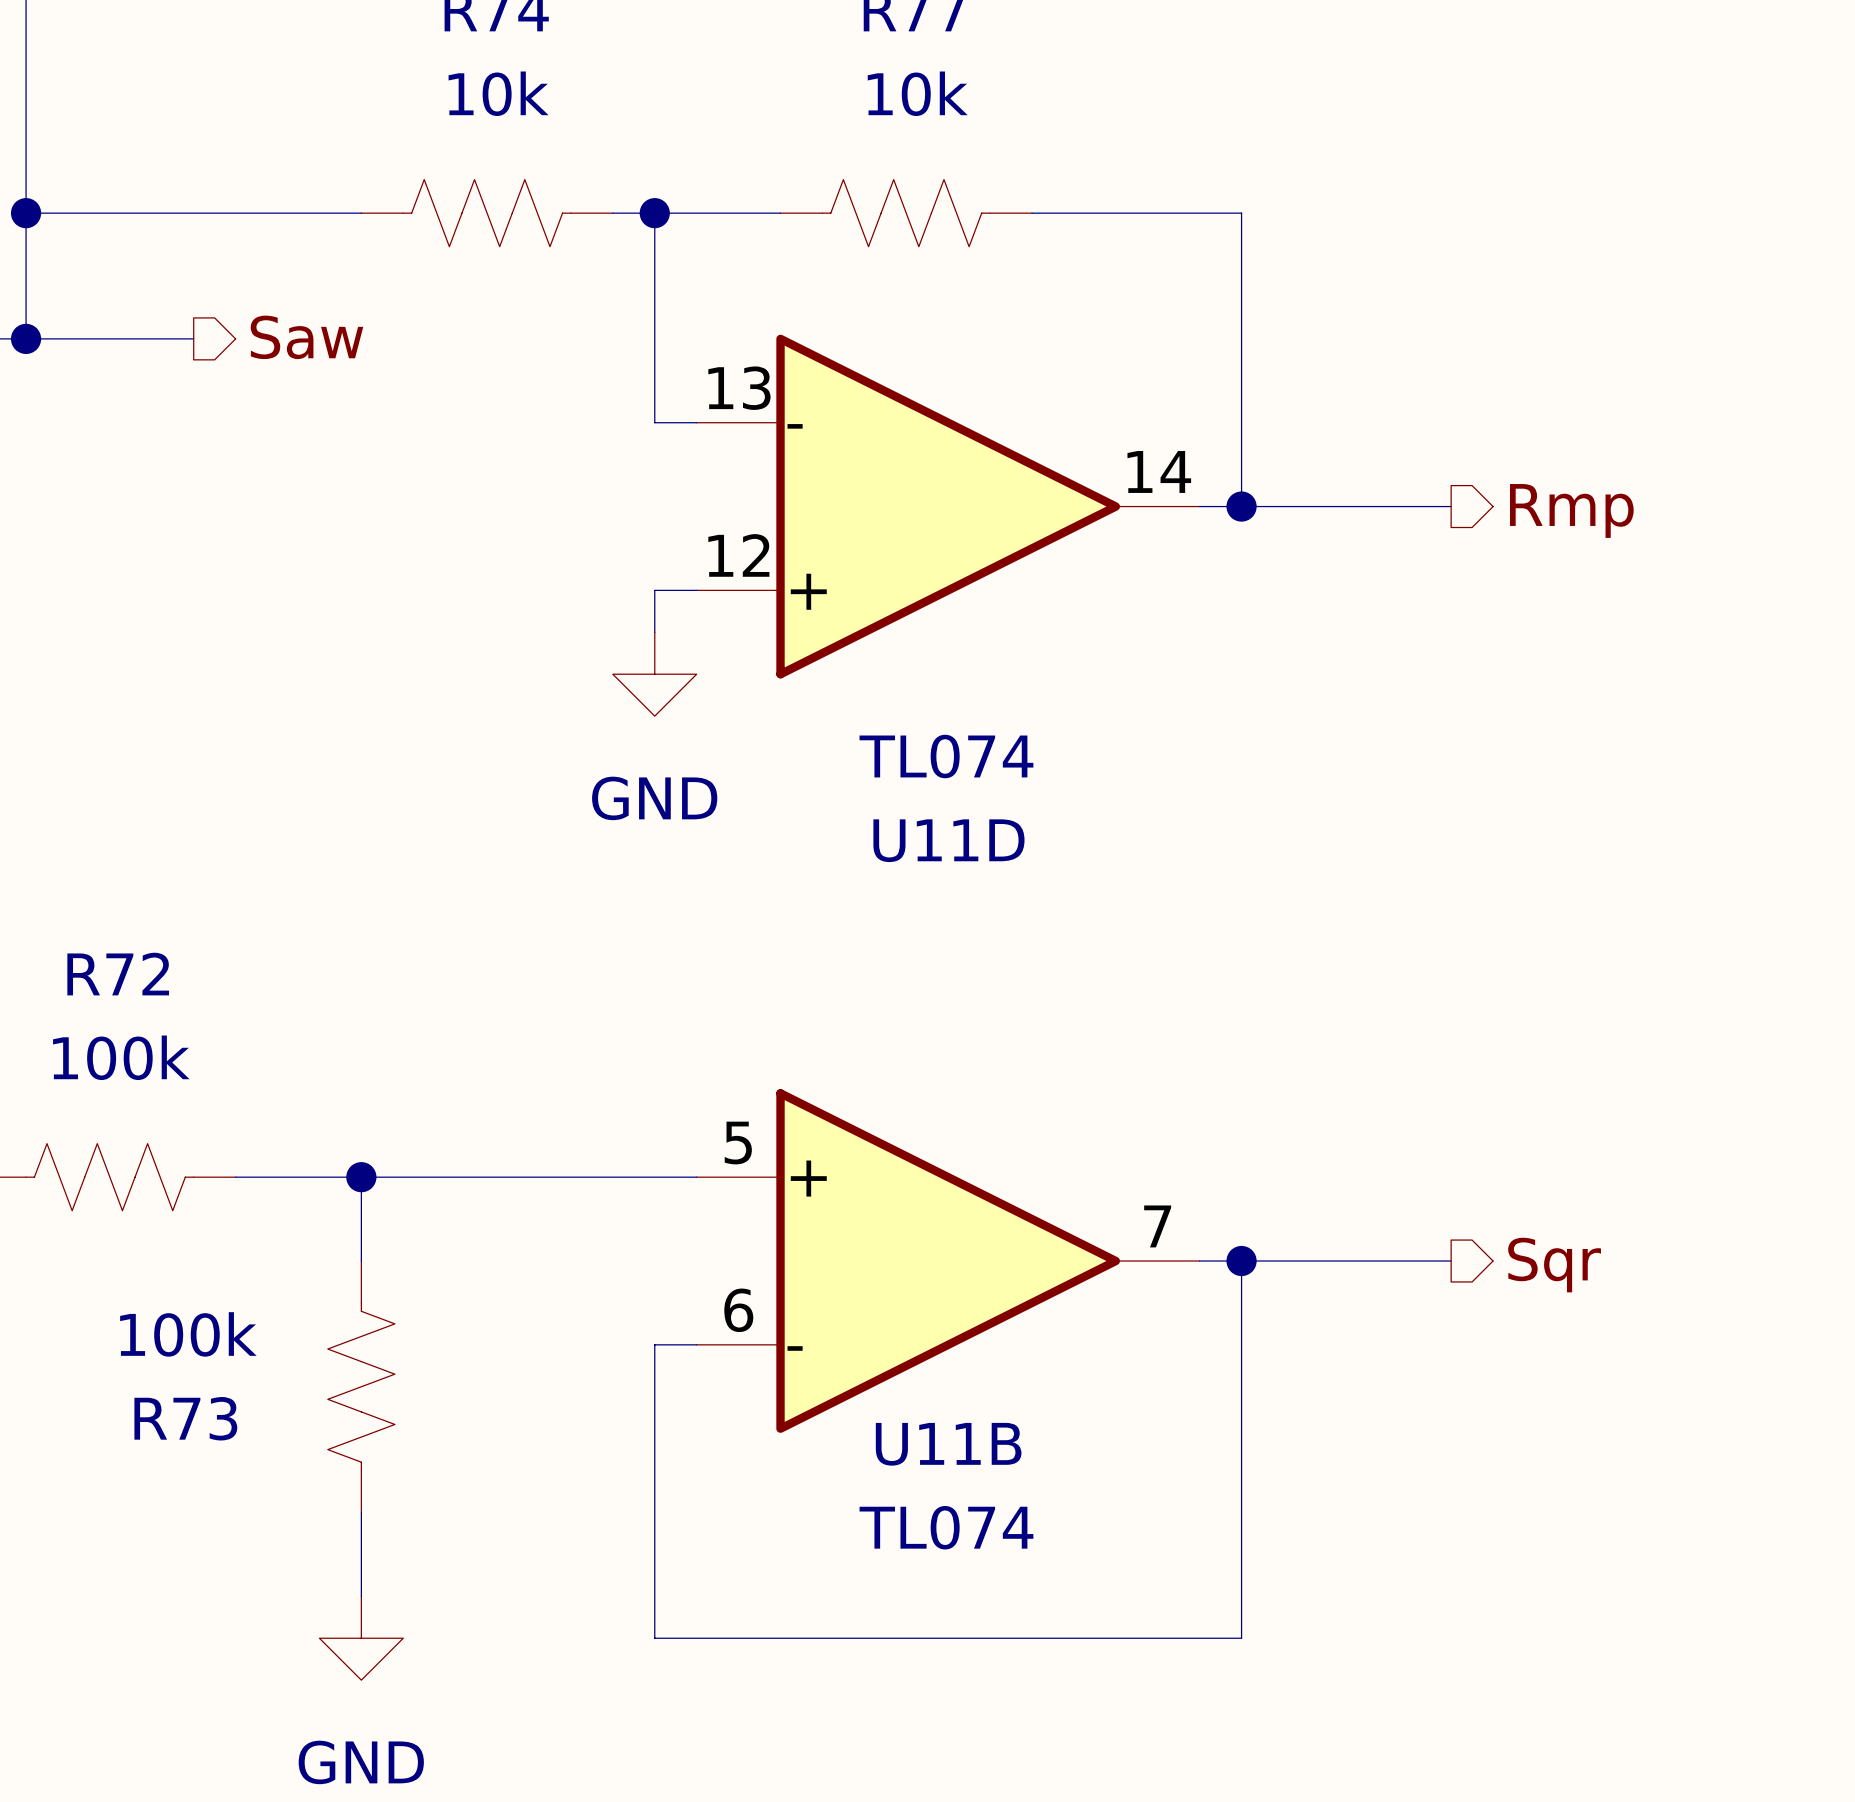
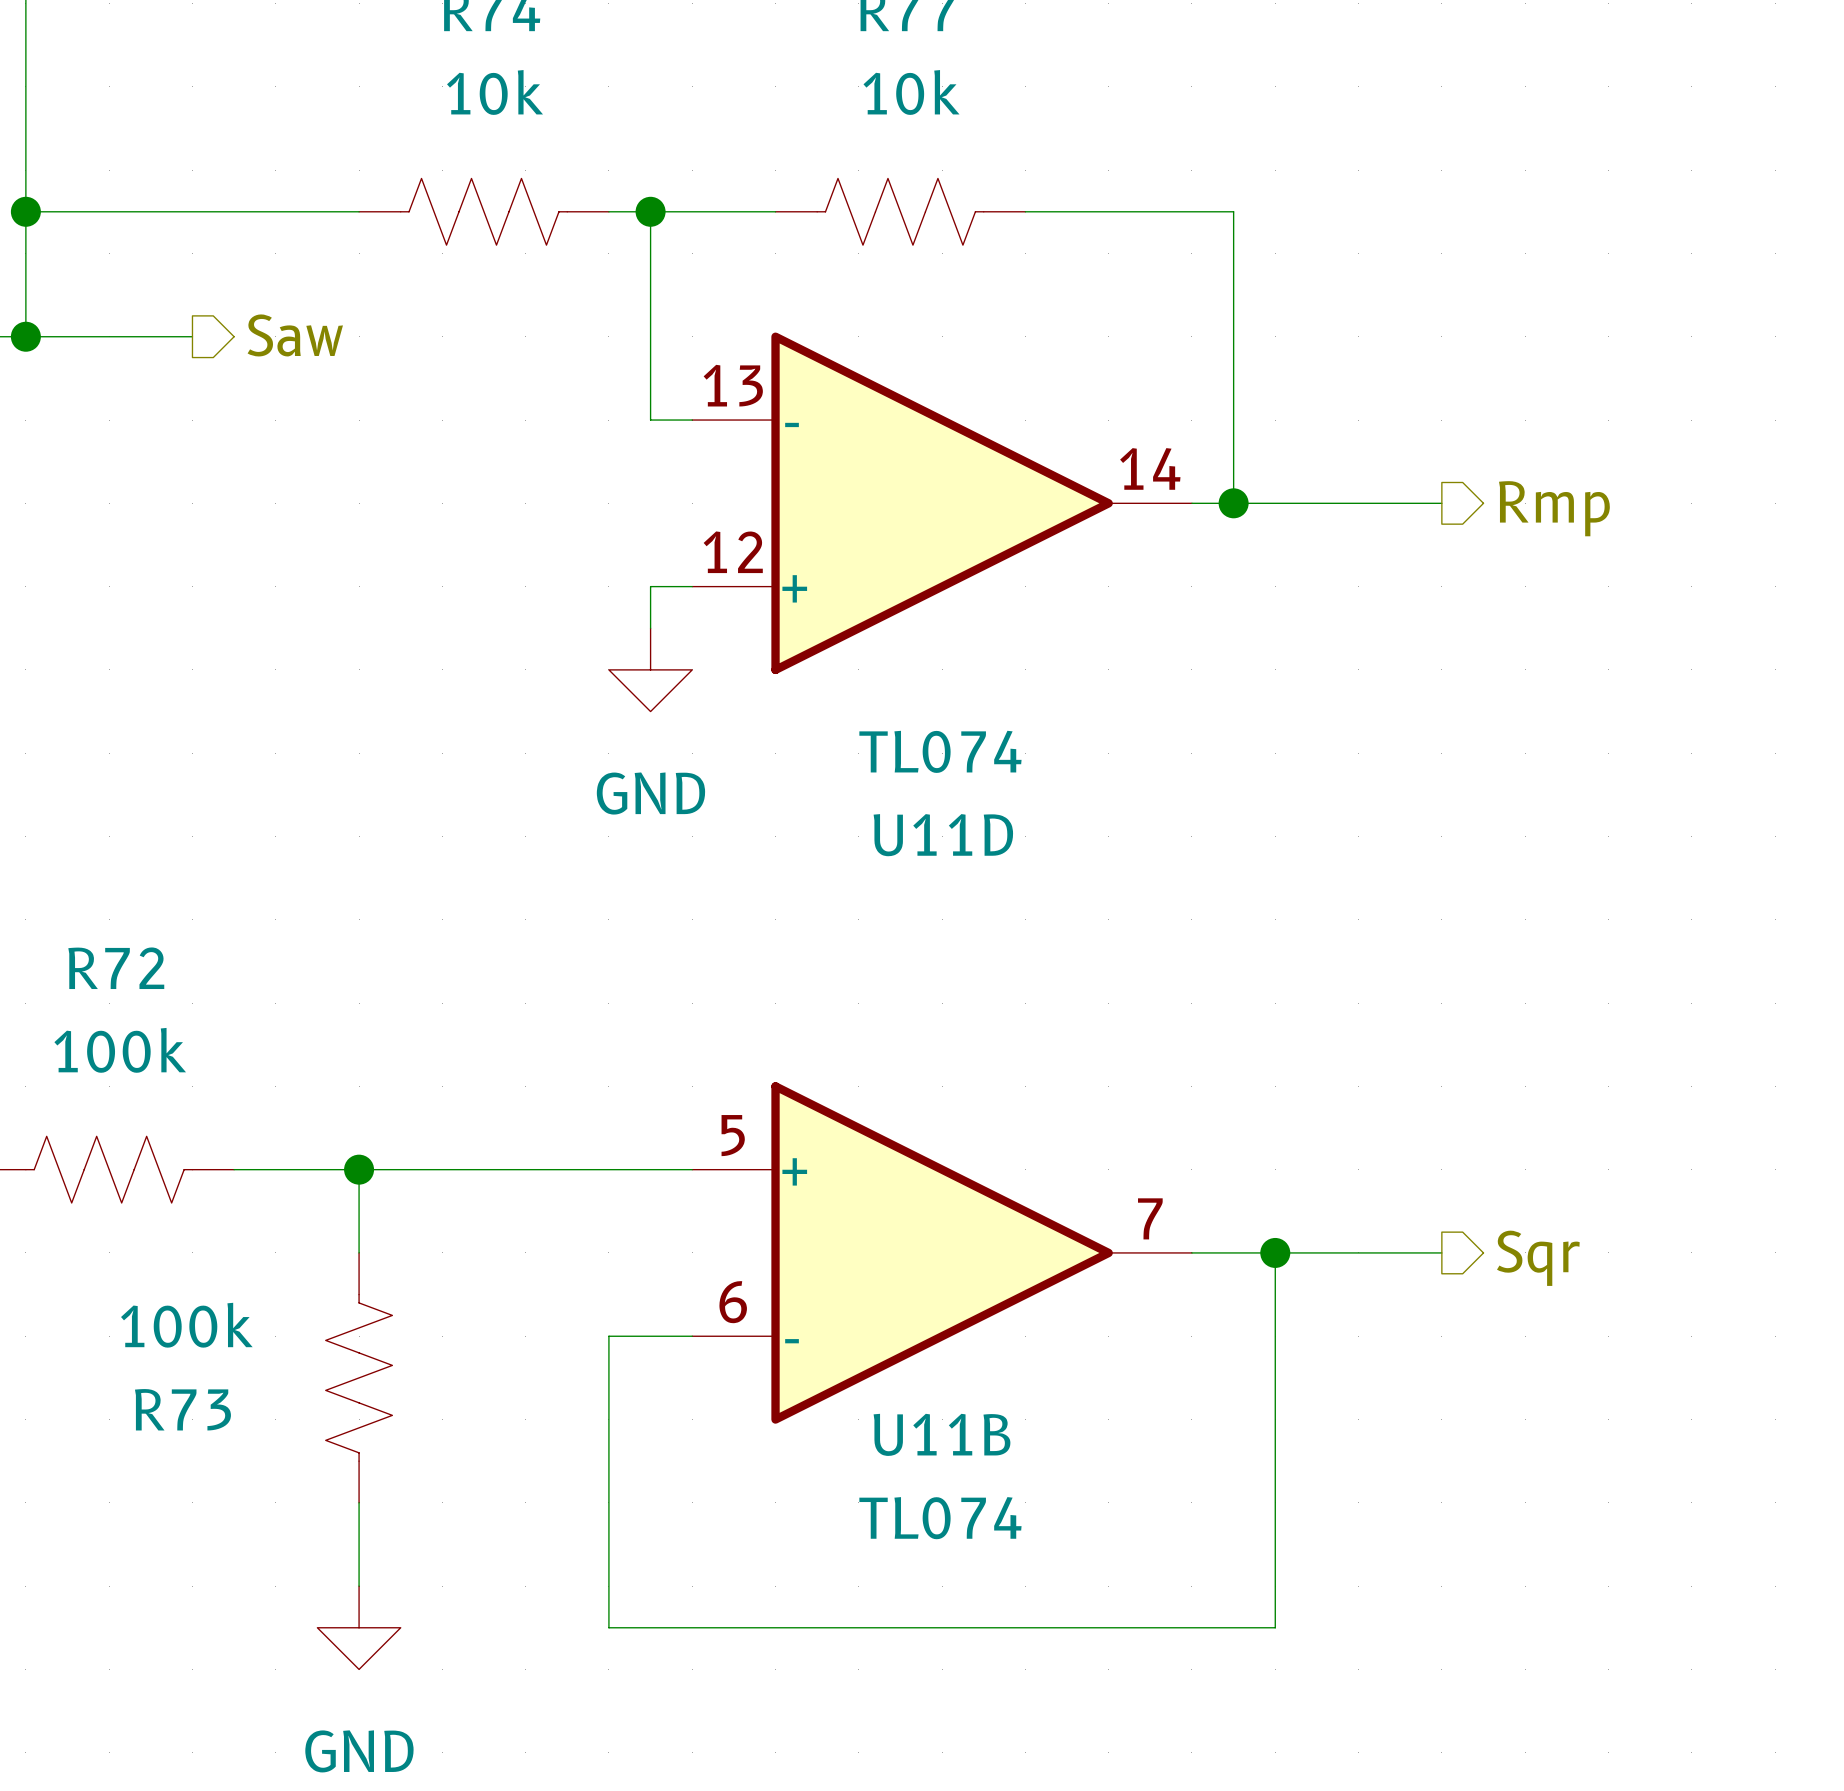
wire: (1241, 1261) (1241, 1638) -> (1275, 1252) (1275, 1627) (1233, 1627)
junction position: (1241, 1261) -> (1275, 1252)
wire: (654, 1344) (654, 1638) -> (650, 1336) (608, 1336) (608, 1627) (650, 1627)

